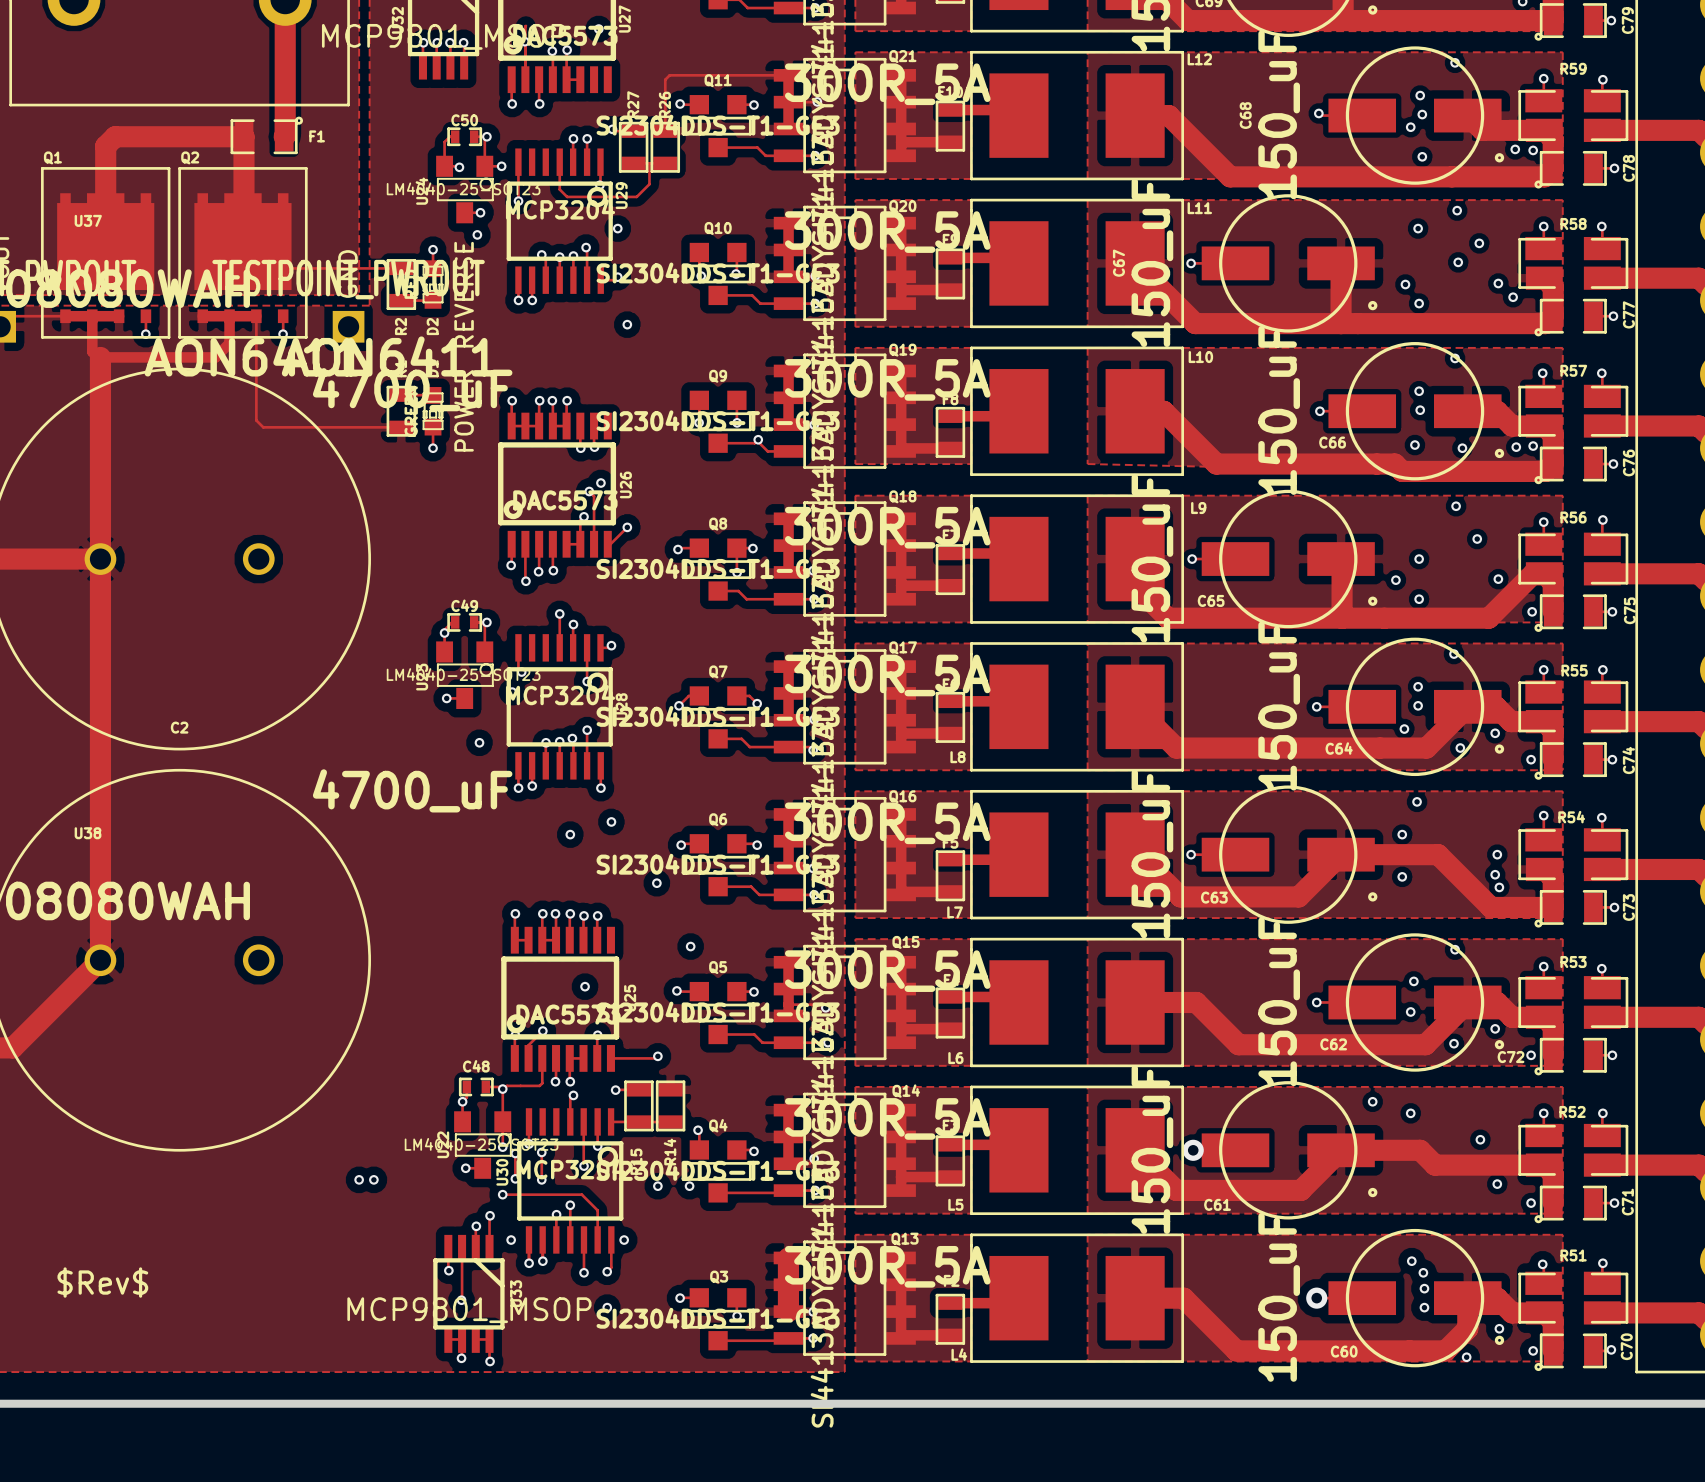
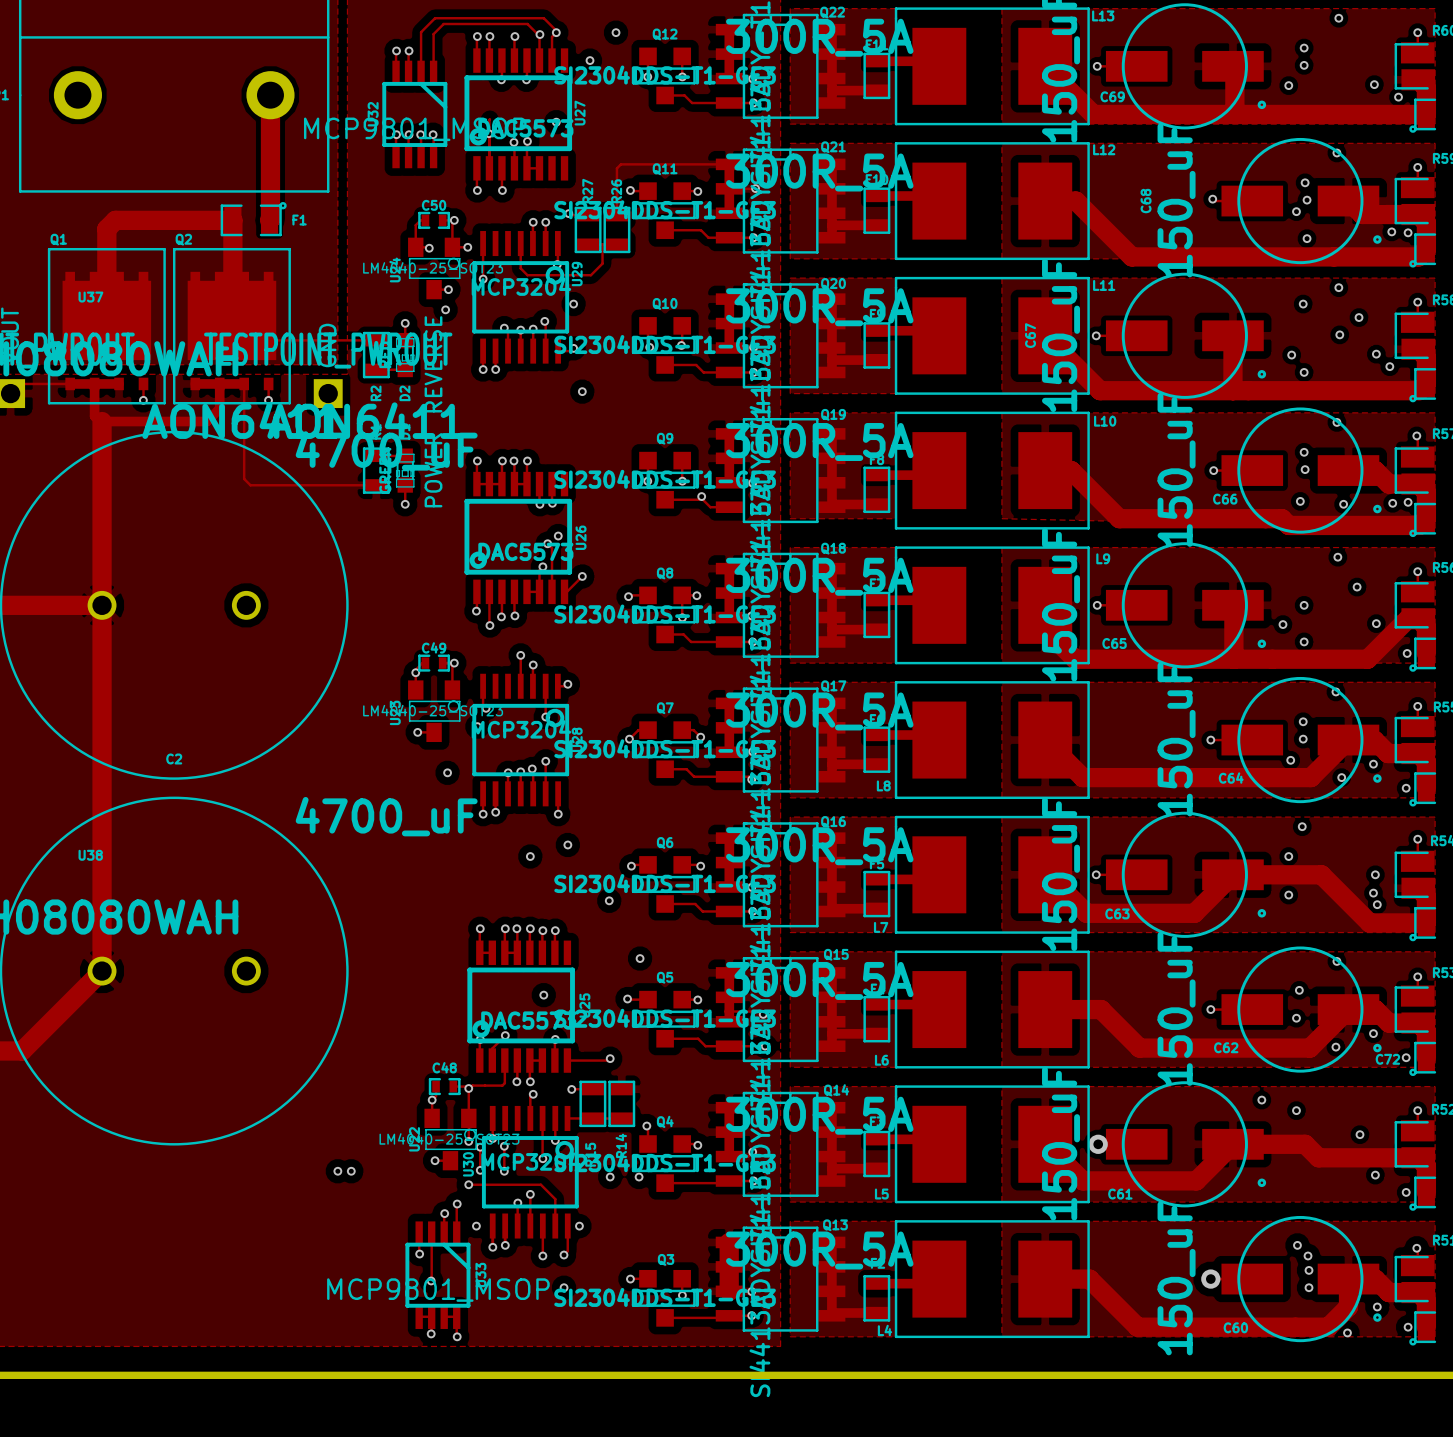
text: $Rev$ (102, 1282) -> none

